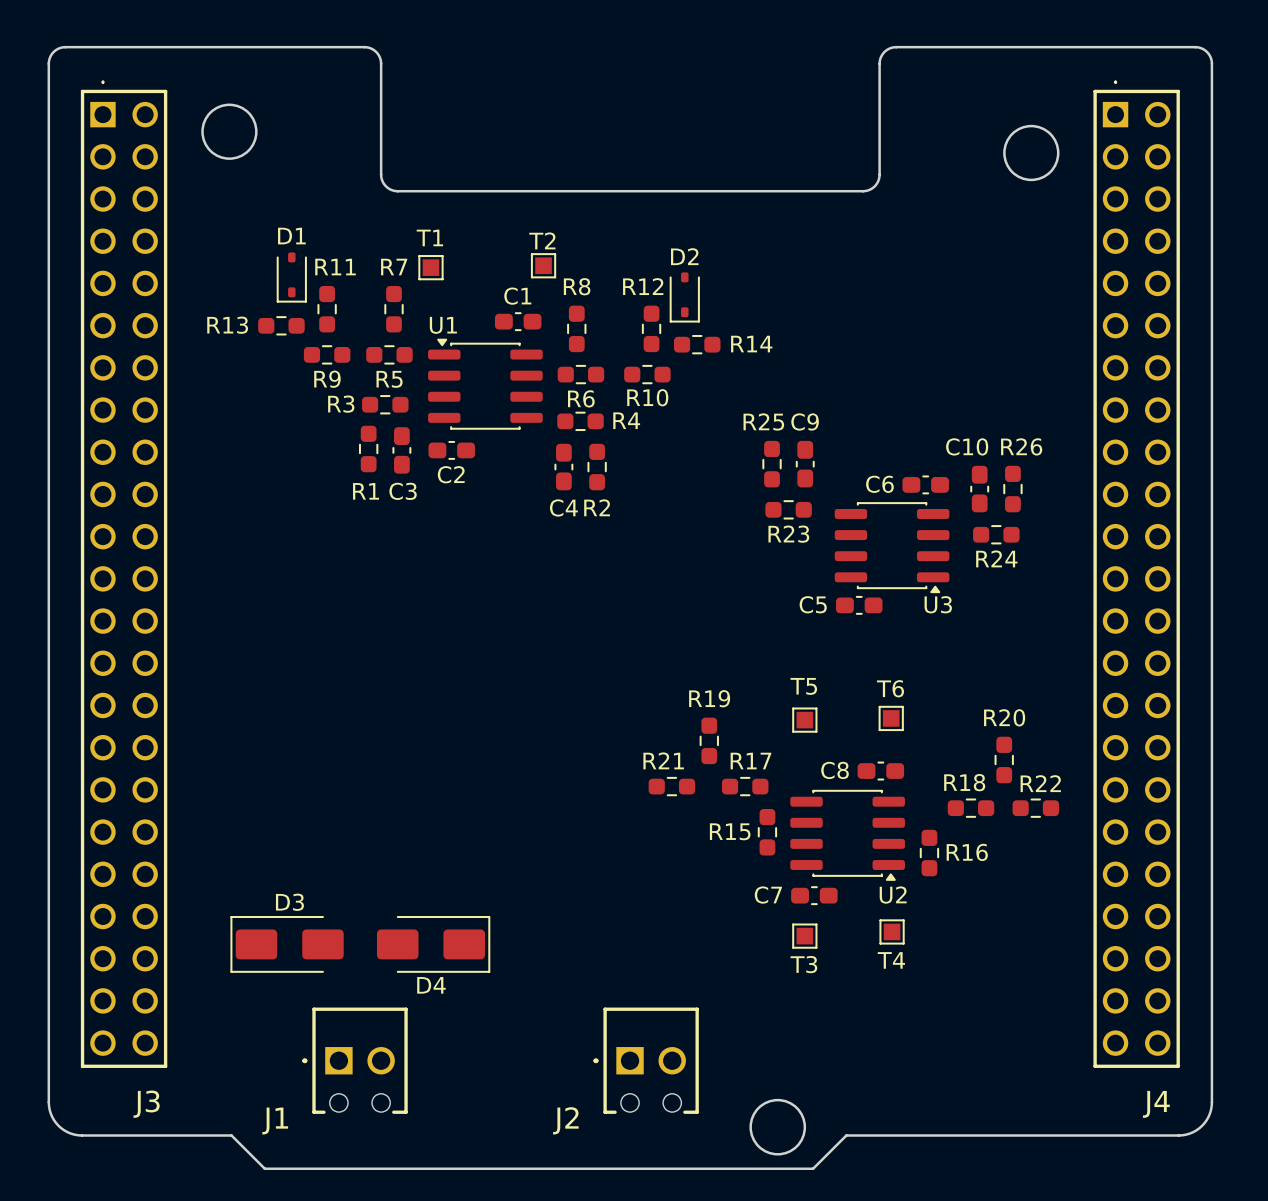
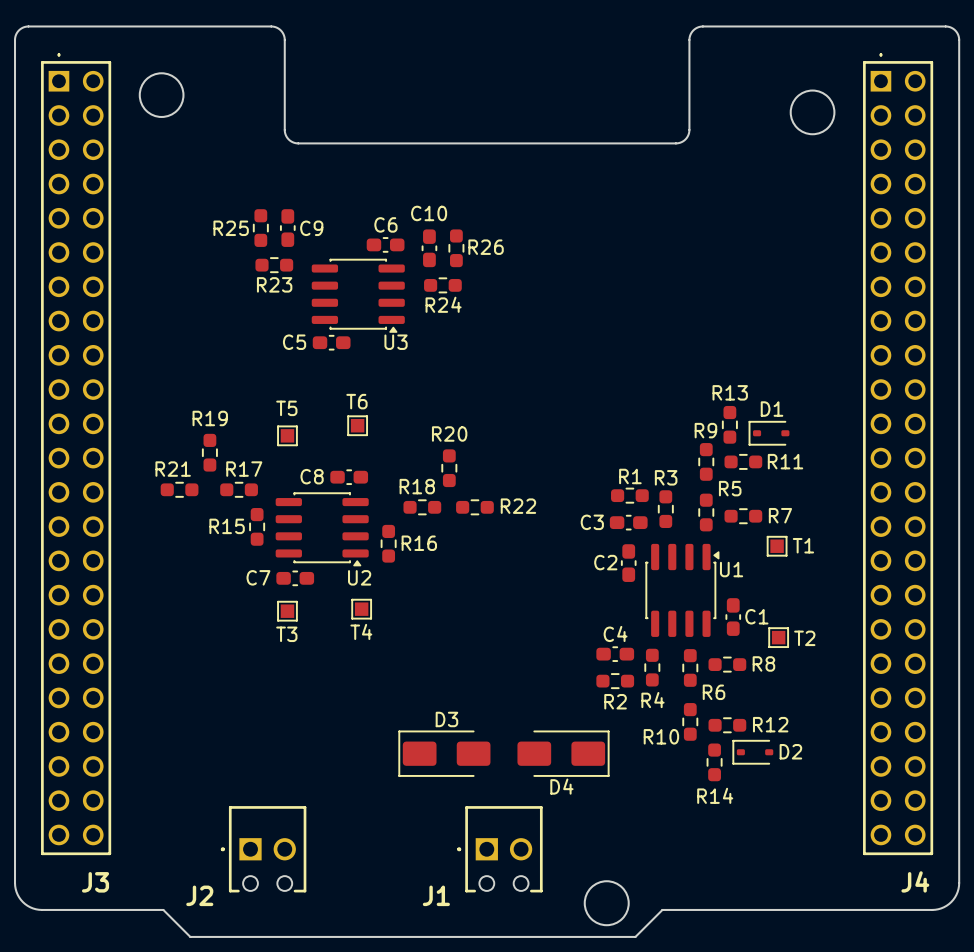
T1 name position: T1 (429, 237) -> T1 (803, 545)
T2 name position: T2 (542, 240) -> T2 (804, 638)
T2 position: (543, 265) -> (778, 637)
T1 position: (430, 267) -> (777, 546)
D1 rotation: 0° (291, 277) -> 90° clockwise (769, 433)
D1 position: (291, 277) -> (769, 433)
D2 rotation: 0° (684, 297) -> 90° clockwise (752, 752)
D2 position: (684, 297) -> (752, 752)
R11 rotation: 0° (327, 309) -> 90° clockwise (743, 461)
R11 position: (327, 309) -> (743, 461)
R7 rotation: 0° (394, 309) -> 90° clockwise (743, 516)
R7 position: (394, 309) -> (743, 516)
C1 rotation: 0° (518, 321) -> 90° clockwise (733, 617)
C1 position: (518, 321) -> (733, 617)
R13 rotation: 0° (281, 325) -> 90° clockwise (729, 424)
R13 position: (281, 325) -> (729, 424)
R8 rotation: 0° (576, 328) -> 90° clockwise (727, 664)
R8 position: (576, 328) -> (727, 664)
R12 rotation: 0° (651, 328) -> 90° clockwise (727, 725)
R12 position: (651, 328) -> (727, 725)
R14 rotation: 0° (697, 344) -> 90° clockwise (714, 762)
R14 position: (697, 344) -> (714, 762)
R9 rotation: 0° (327, 354) -> 90° clockwise (706, 461)
R9 position: (327, 354) -> (706, 461)
R5 rotation: 0° (389, 354) -> 90° clockwise (706, 512)
R5 position: (389, 354) -> (706, 512)
R6 rotation: 0° (580, 374) -> 90° clockwise (690, 667)
R6 position: (580, 374) -> (690, 667)
R10 rotation: 0° (647, 374) -> 90° clockwise (690, 721)
R10 position: (647, 374) -> (690, 721)
R9 name position: R9 (327, 379) -> R9 (705, 430)
R5 name position: R5 (389, 379) -> R5 (730, 488)
U1 rotation: 0° (485, 384) -> 90° clockwise (682, 590)
U1 position: (485, 384) -> (682, 590)
R3 rotation: 0° (385, 404) -> 90° clockwise (665, 509)
R3 position: (385, 404) -> (665, 509)
R4 rotation: 0° (580, 421) -> 90° clockwise (652, 667)
R4 position: (580, 421) -> (652, 667)
R25 name position: R25 (763, 421) -> R25 (231, 228)
C9 name position: C9 (805, 421) -> C9 (311, 228)
C10 name position: C10 (967, 446) -> C10 (429, 213)
R26 name position: R26 (1021, 446) -> R26 (486, 247)
R1 rotation: 0° (368, 448) -> 90° clockwise (629, 495)
R1 position: (368, 448) -> (629, 495)
C3 rotation: 0° (401, 450) -> 90° clockwise (628, 522)
C3 position: (401, 450) -> (628, 522)
C2 rotation: 0° (451, 450) -> 90° clockwise (628, 563)
C2 position: (451, 450) -> (628, 563)
R25 position: (772, 464) -> (260, 228)
C9 position: (805, 464) -> (287, 228)
C4 rotation: 0° (563, 467) -> 90° clockwise (615, 654)
C4 position: (563, 467) -> (615, 654)
R2 rotation: 0° (597, 467) -> 90° clockwise (615, 681)
R2 position: (597, 467) -> (615, 681)
C6 name position: C6 (879, 484) -> C6 (385, 224)
C6 position: (925, 484) -> (385, 244)
C10 position: (979, 489) -> (429, 248)
R26 position: (1012, 489) -> (456, 248)
R1 name position: R1 (366, 491) -> R1 (630, 476)
C4 name position: C4 (563, 507) -> C4 (615, 633)
R23 position: (788, 509) -> (274, 265)
R24 position: (996, 534) -> (442, 285)
U3 position: (892, 547) -> (358, 295)
C5 position: (859, 605) -> (331, 342)
T6 position: (891, 718) -> (357, 425)
T5 position: (804, 720) -> (287, 435)
R19 position: (709, 740) -> (209, 452)
R20 position: (1004, 759) -> (449, 468)
C8 position: (880, 771) -> (349, 477)
R22 name position: R22 (1040, 783) -> R22 (518, 506)
R21 position: (671, 786) -> (179, 489)
R17 position: (745, 786) -> (239, 489)
R18 position: (970, 808) -> (422, 507)
R22 position: (1035, 808) -> (474, 507)
R15 position: (767, 832) -> (257, 526)
U2 position: (847, 835) -> (322, 529)
R16 position: (929, 853) -> (388, 543)
C7 position: (814, 895) -> (295, 578)
T4 position: (892, 931) -> (361, 609)
T3 position: (804, 936) -> (287, 611)
D3 position: (287, 944) -> (444, 753)
D4 position: (433, 944) -> (563, 753)
J2 name: J2 (565, 1120) -> J1 (436, 895)
J1 name: J1 (275, 1121) -> J2 (199, 895)

